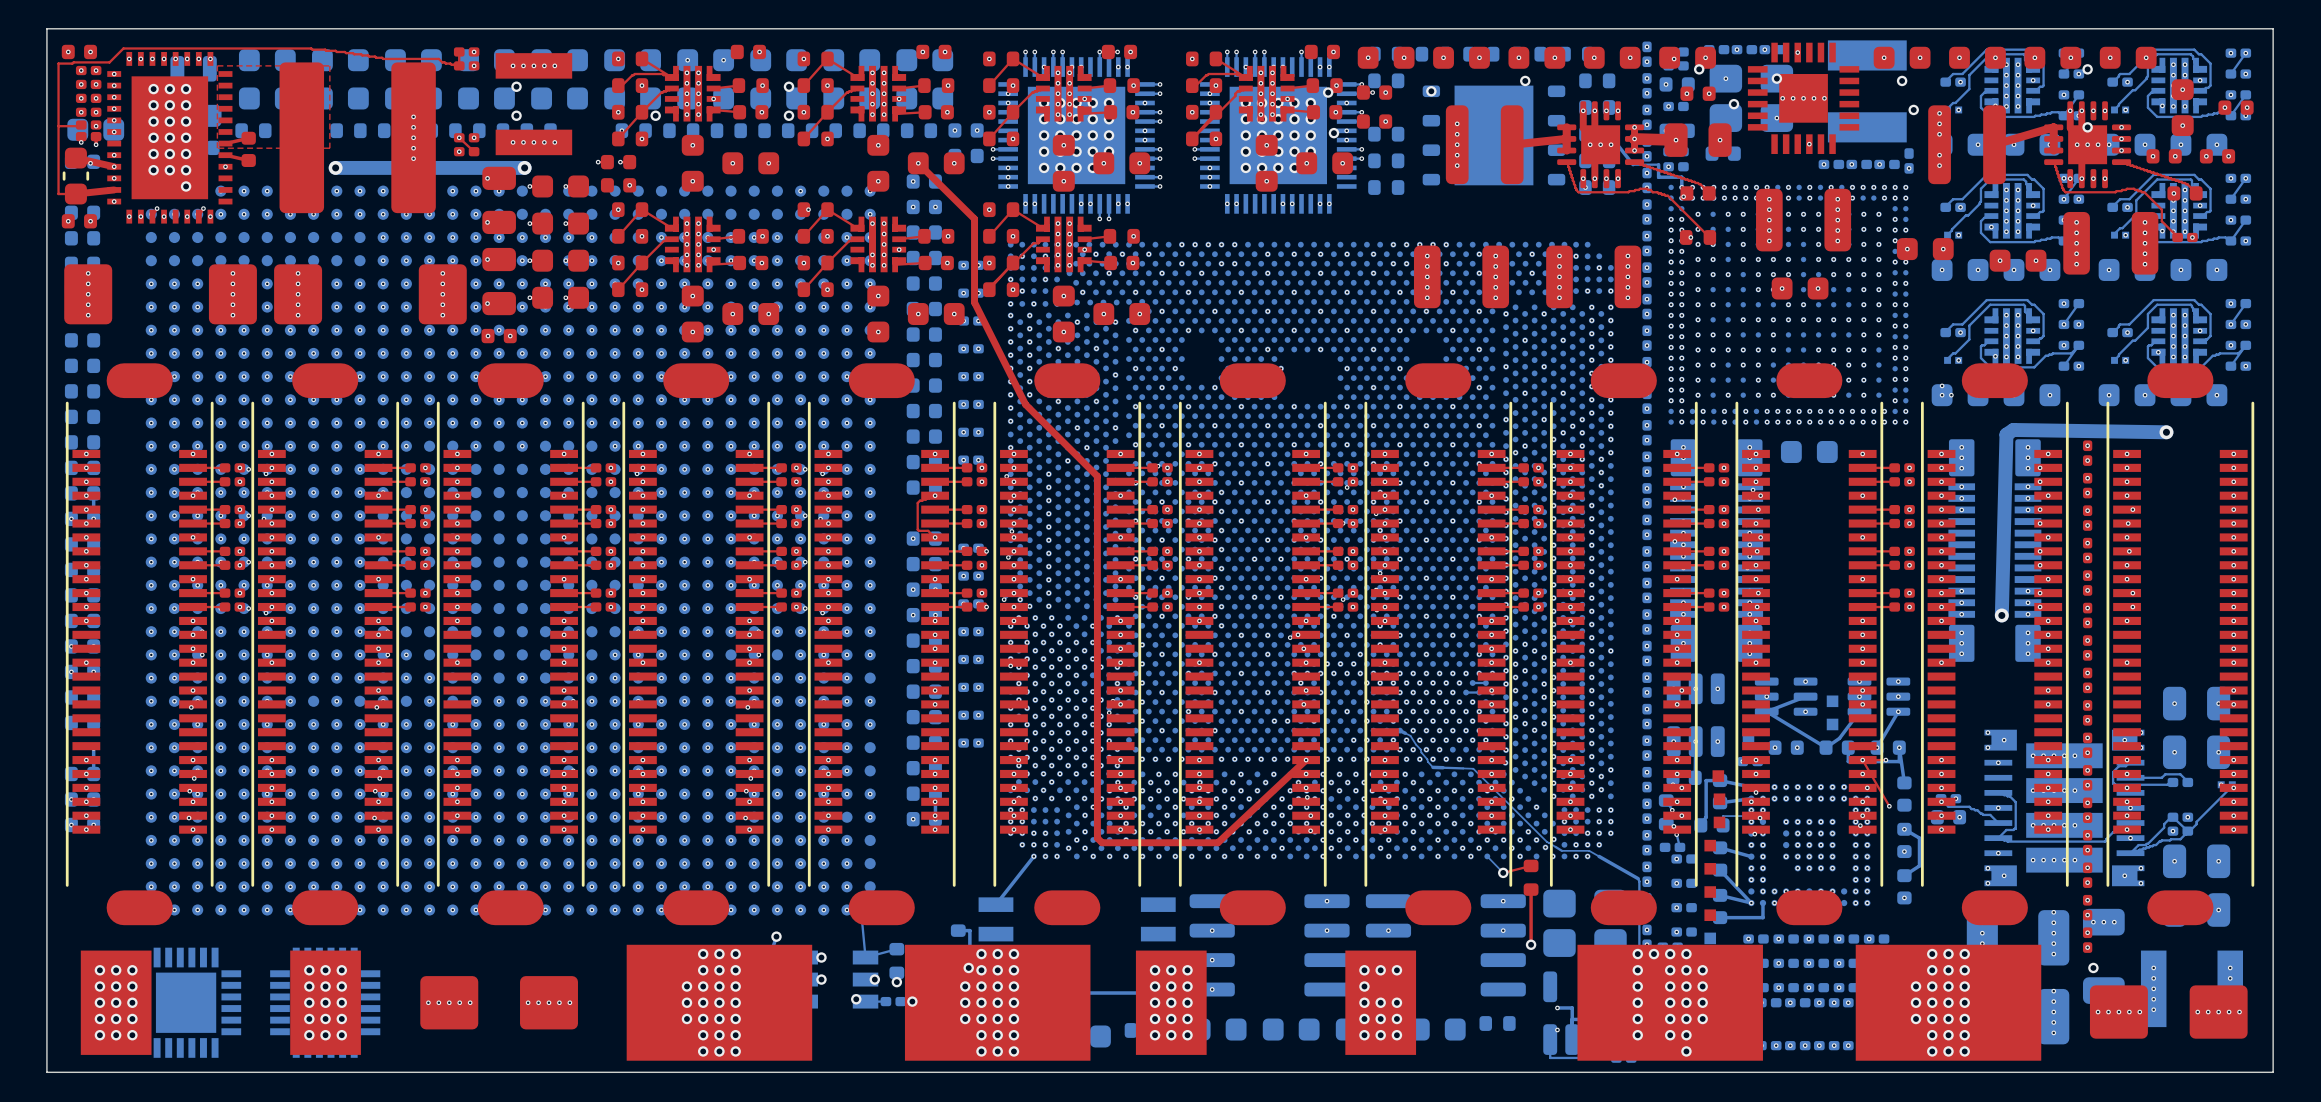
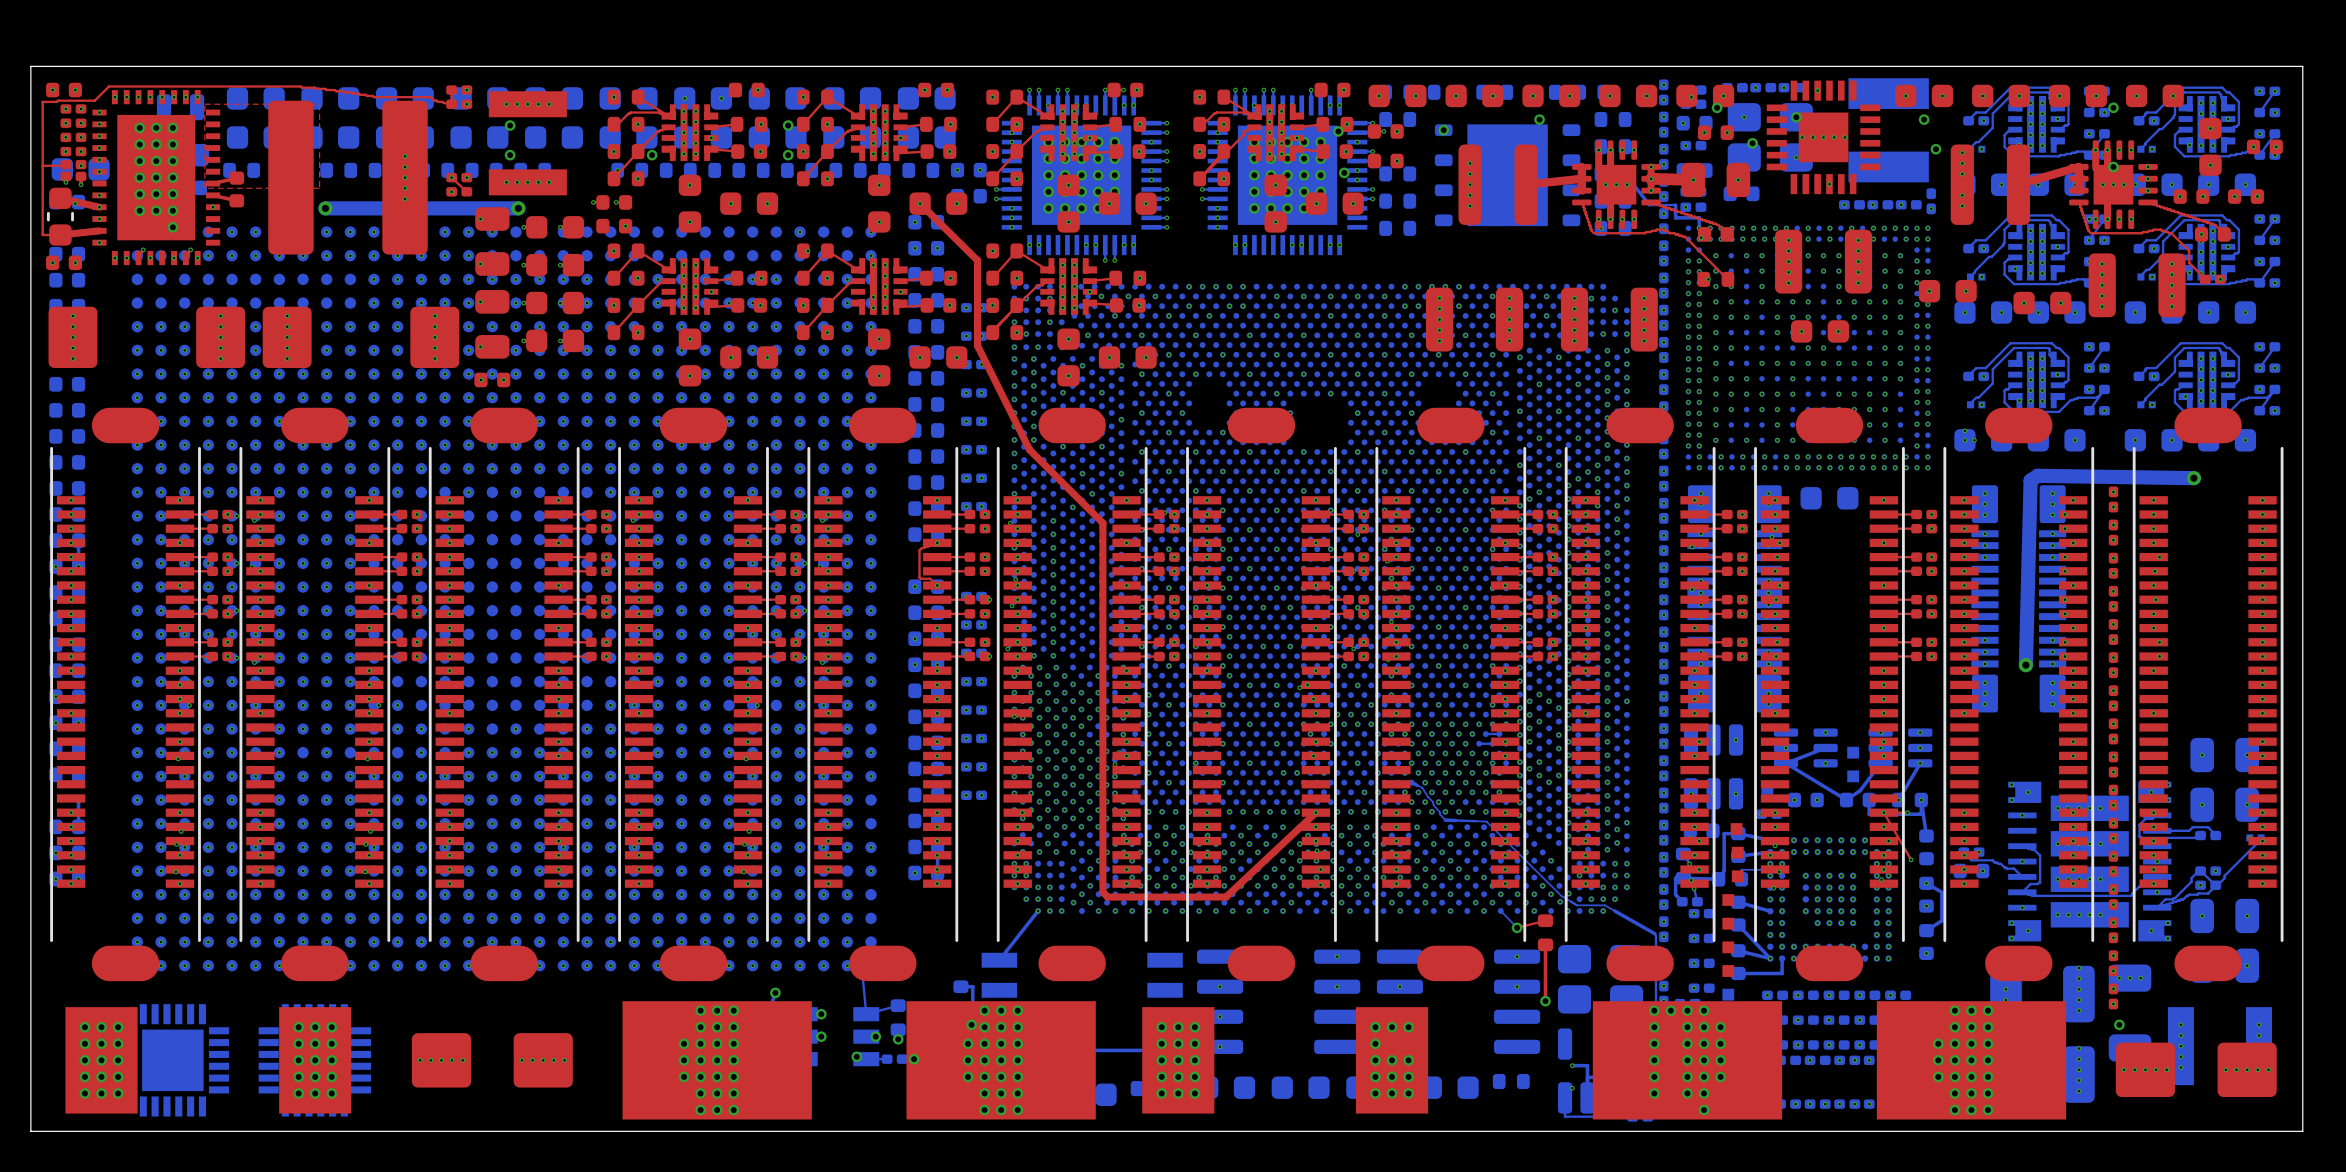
bottom track: none -> (1718, 879) (1675, 878) (1675, 894) (1682, 901)

